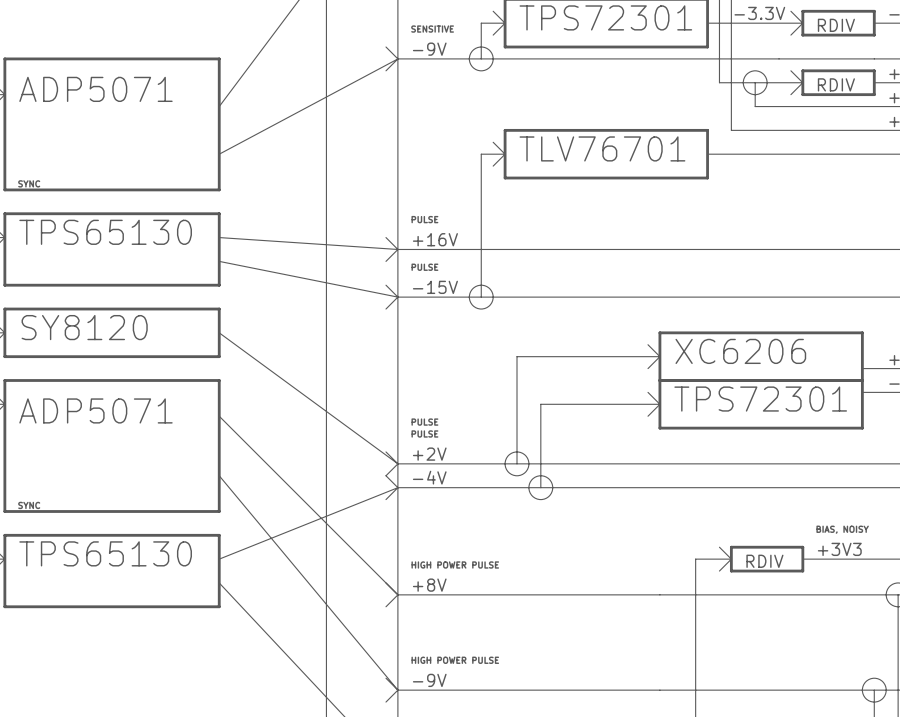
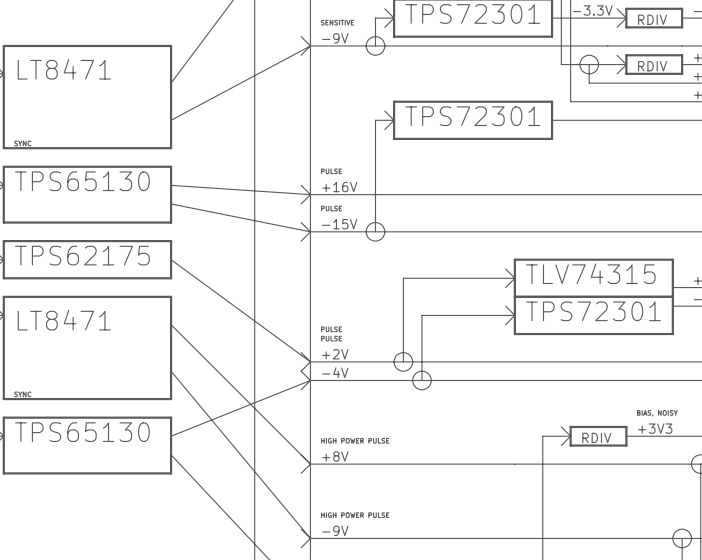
text: ADP5071 (95, 89) -> LT8471 (64, 69)
text: TLV76701 (602, 148) -> TPS72301 (472, 116)
text: SY8120 (84, 327) -> TPS62175 (82, 255)
text: XC6206 (740, 351) -> TLV74315 (590, 273)
text: ADP5071 (95, 410) -> LT8471 (64, 320)

